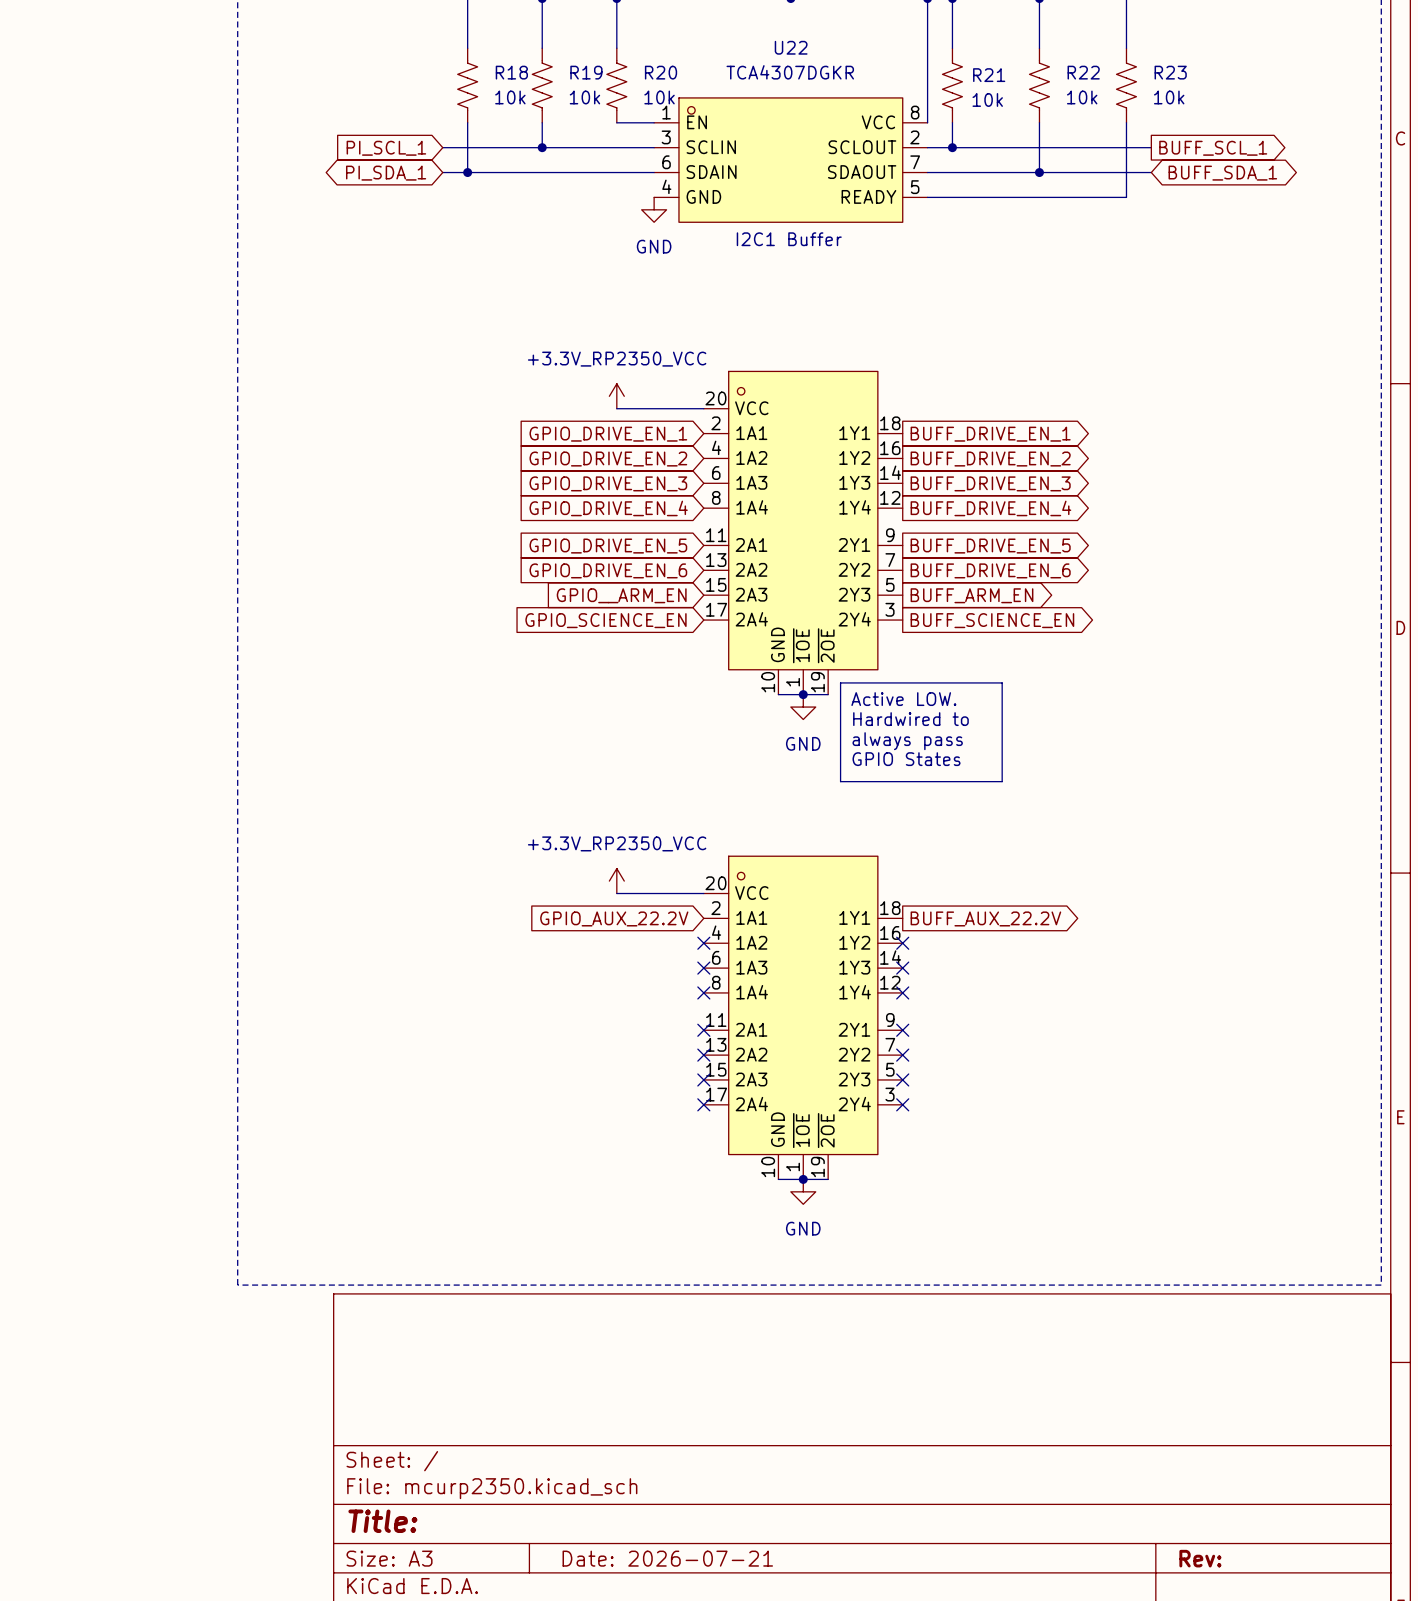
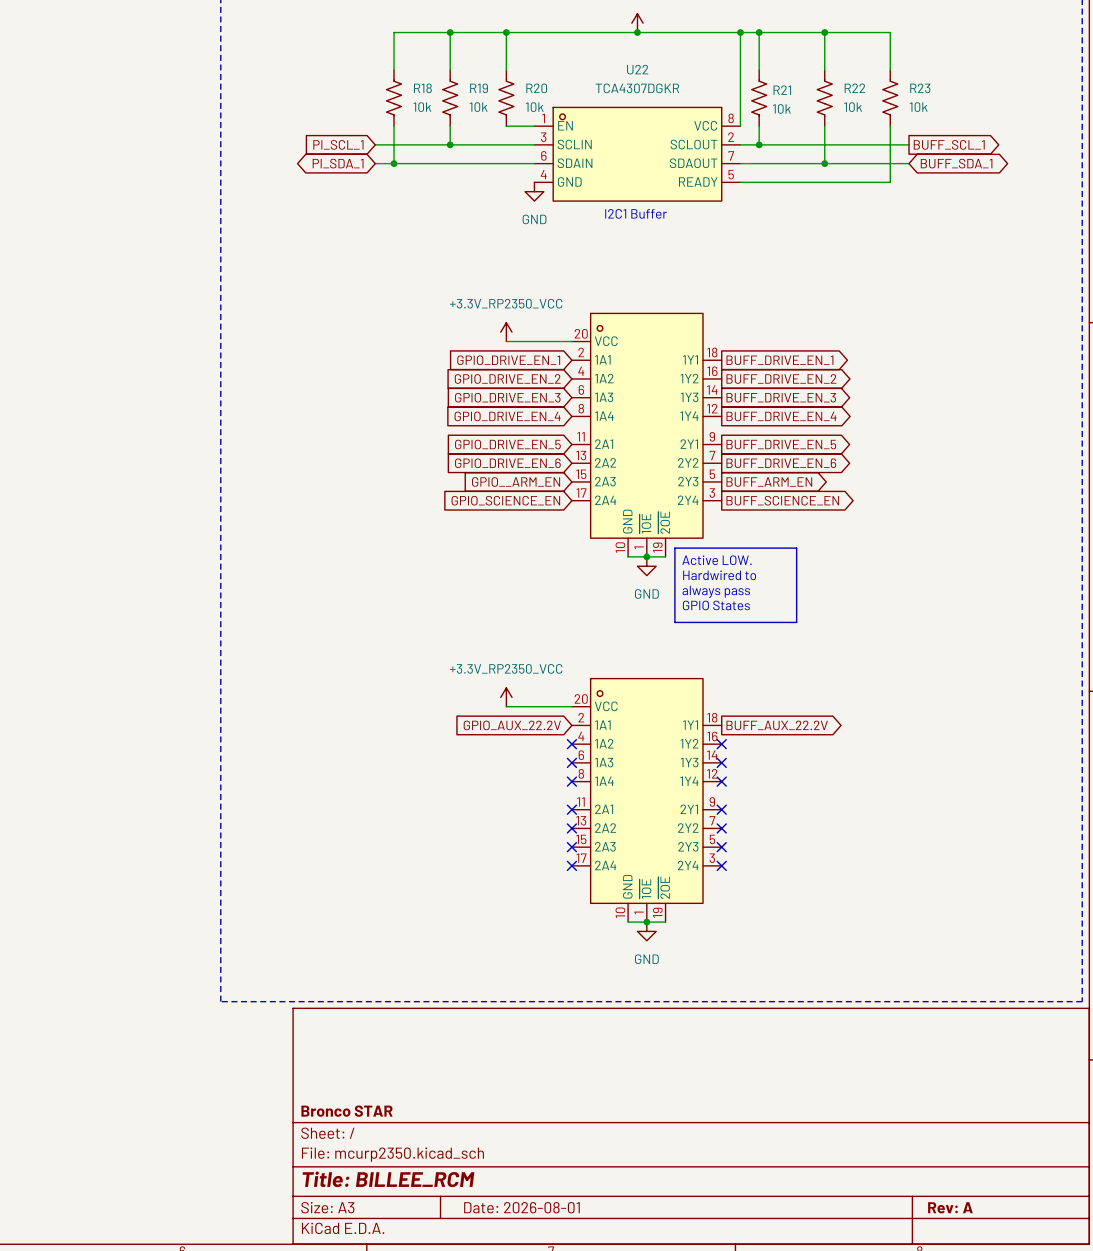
title block: none -> Bronco STAR (346, 1111)
title block: Title: (382, 1521) -> Title: BILLEE_RCM (388, 1179)
title block: Date: 2026-07-21 (667, 1558) -> Date: 2026-08-01 (521, 1207)
title block: Rev: (1200, 1558) -> Rev: A (950, 1207)

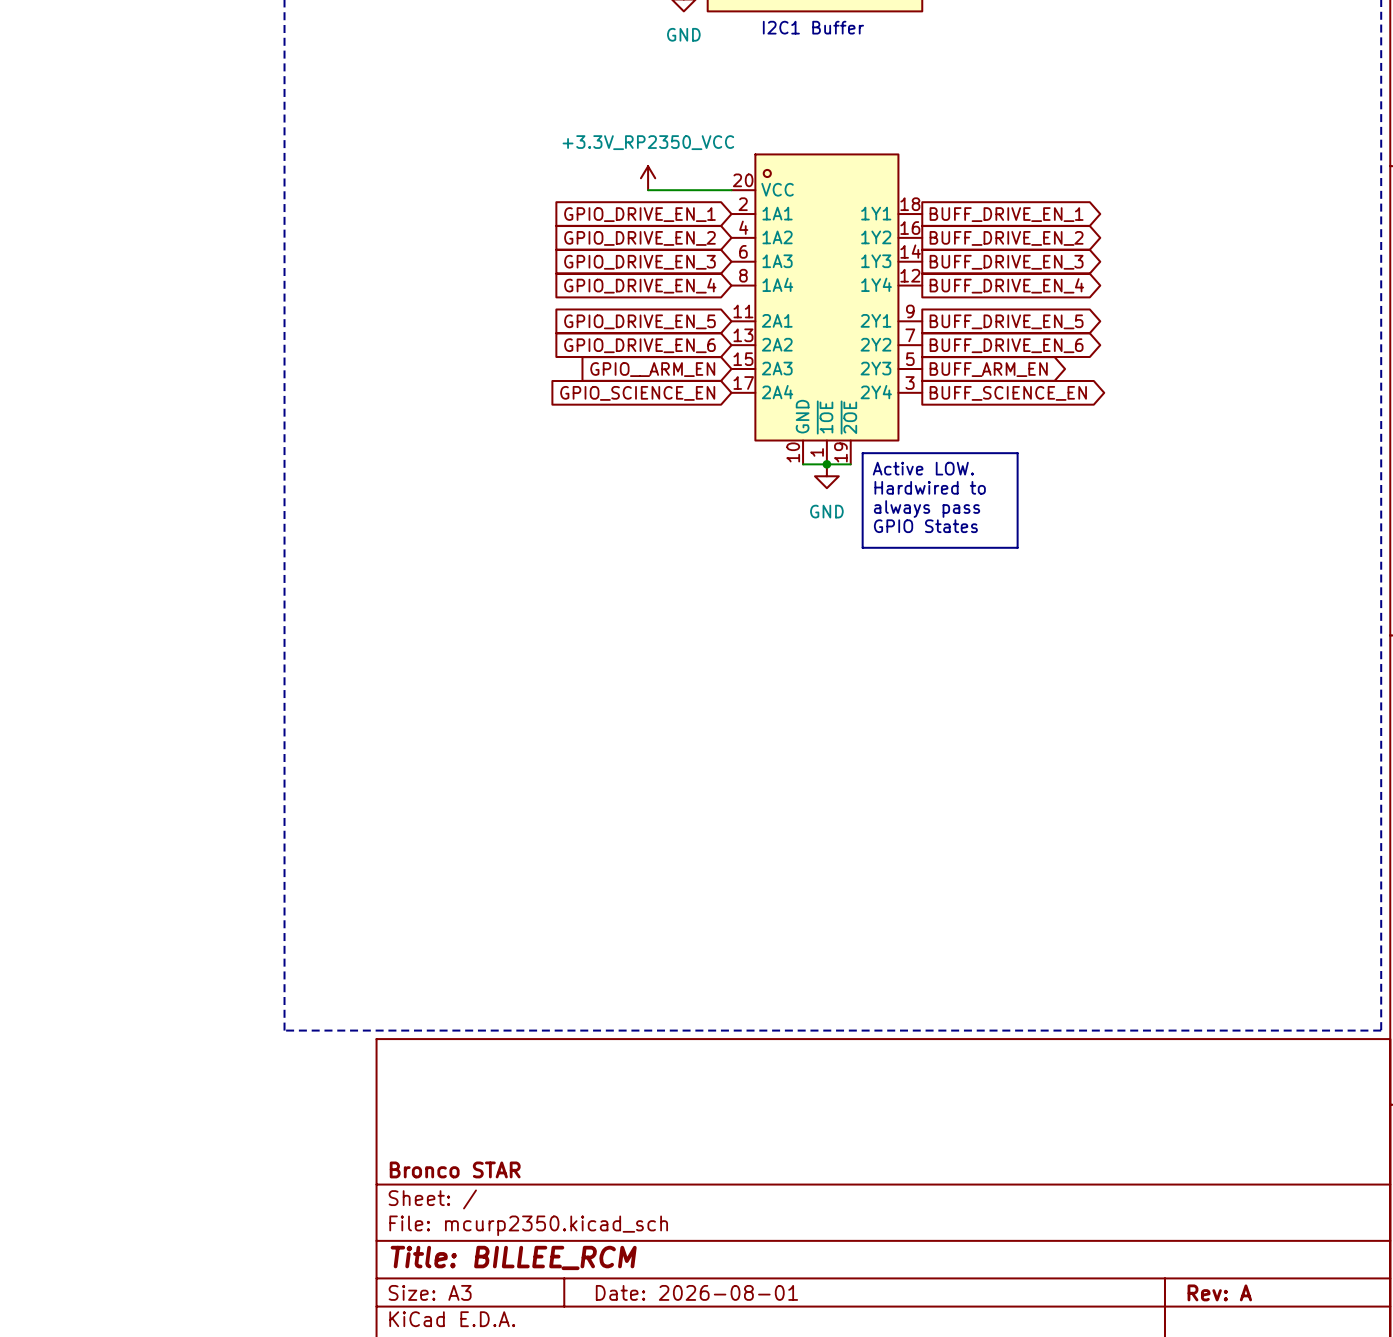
power symbol: +3.3V_RP2350_VCC (506, 697) -> none
wire: (506, 706) (571, 706) -> none
global label: GPIO_AUX_22.2V (512, 725) -> none
global label: BUFF_AUX_22.2V (777, 725) -> none
no-connect mark: (571, 744) -> none
no-connect mark: (721, 744) -> none
no-connect mark: (571, 762) -> none
no-connect mark: (721, 762) -> none
no-connect mark: (571, 781) -> none
no-connect mark: (721, 781) -> none
part: (646, 800) -> none
no-connect mark: (571, 809) -> none
no-connect mark: (721, 809) -> none
no-connect mark: (571, 828) -> none
no-connect mark: (721, 828) -> none
no-connect mark: (571, 847) -> none
no-connect mark: (721, 847) -> none
no-connect mark: (571, 865) -> none
no-connect mark: (721, 865) -> none
wire: (628, 922) (665, 922) -> none
junction: (646, 922) -> none
power symbol: GND (646, 931) -> none

